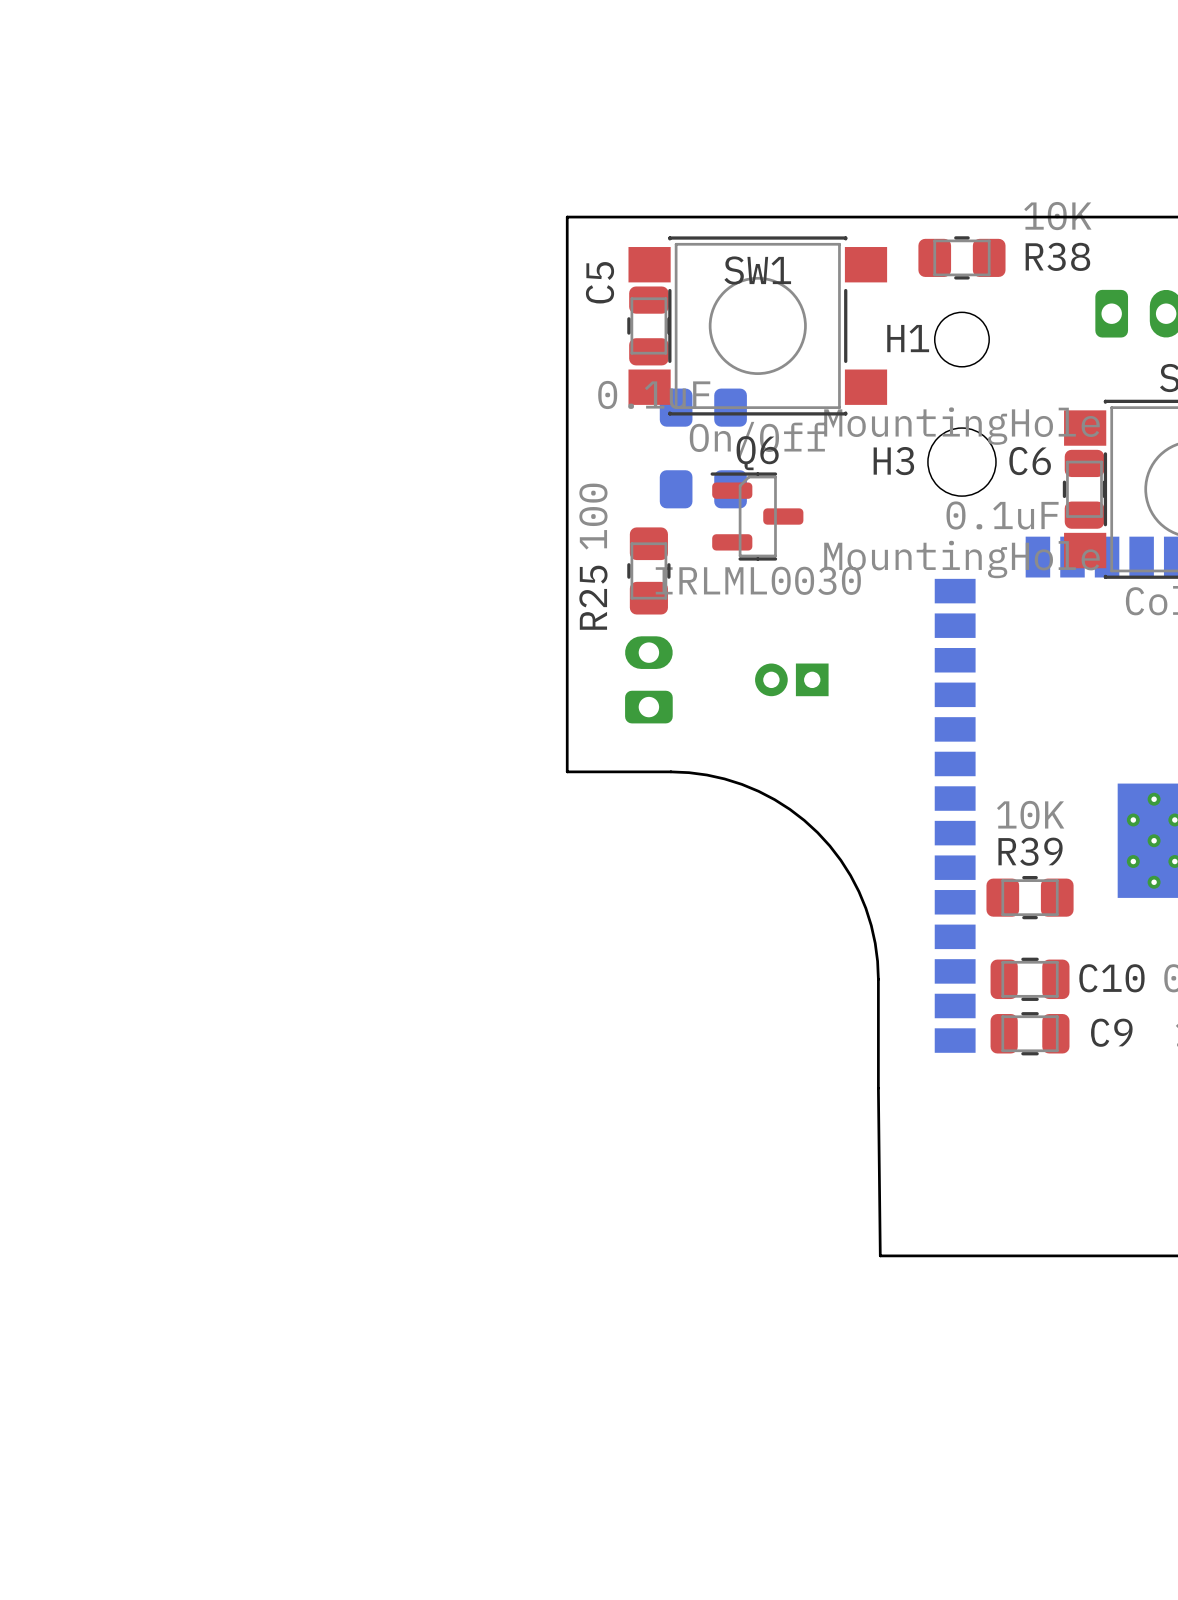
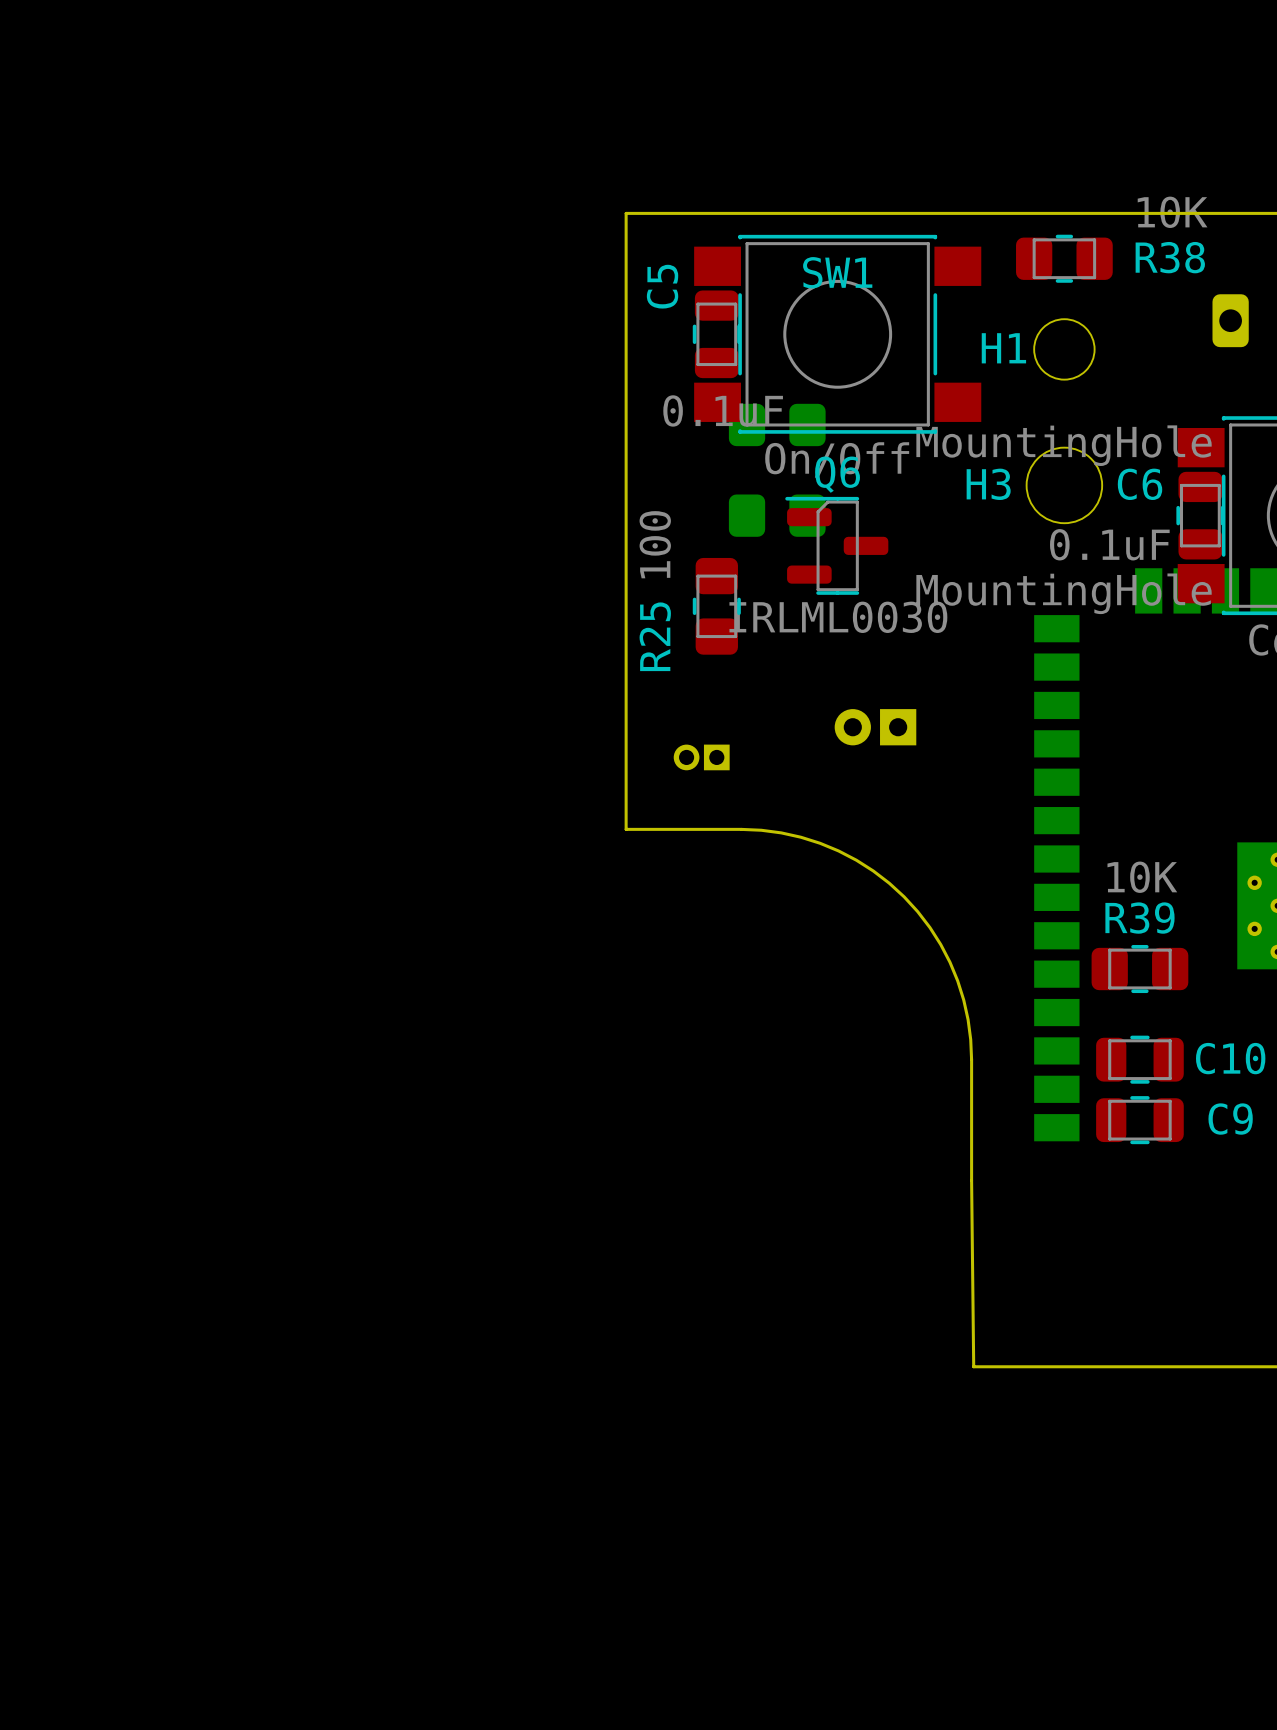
part: (648, 679) -> none
part: none -> (701, 757)

